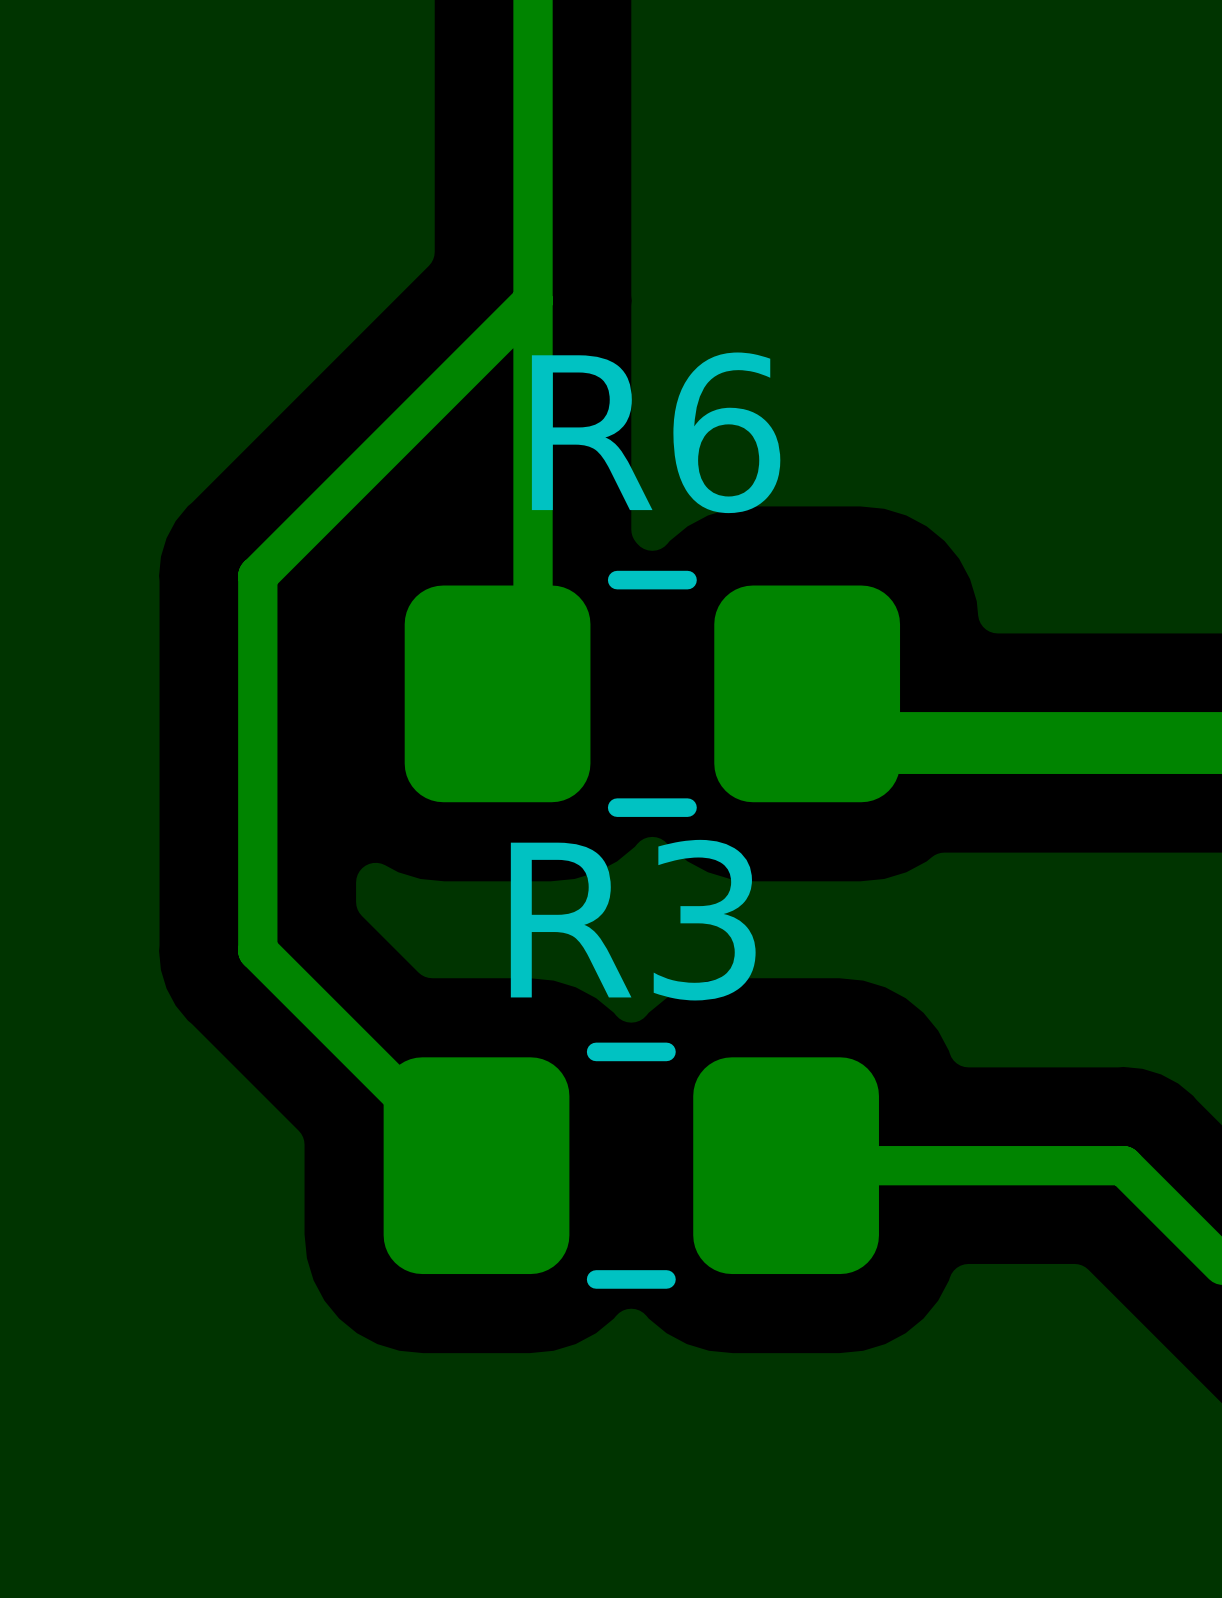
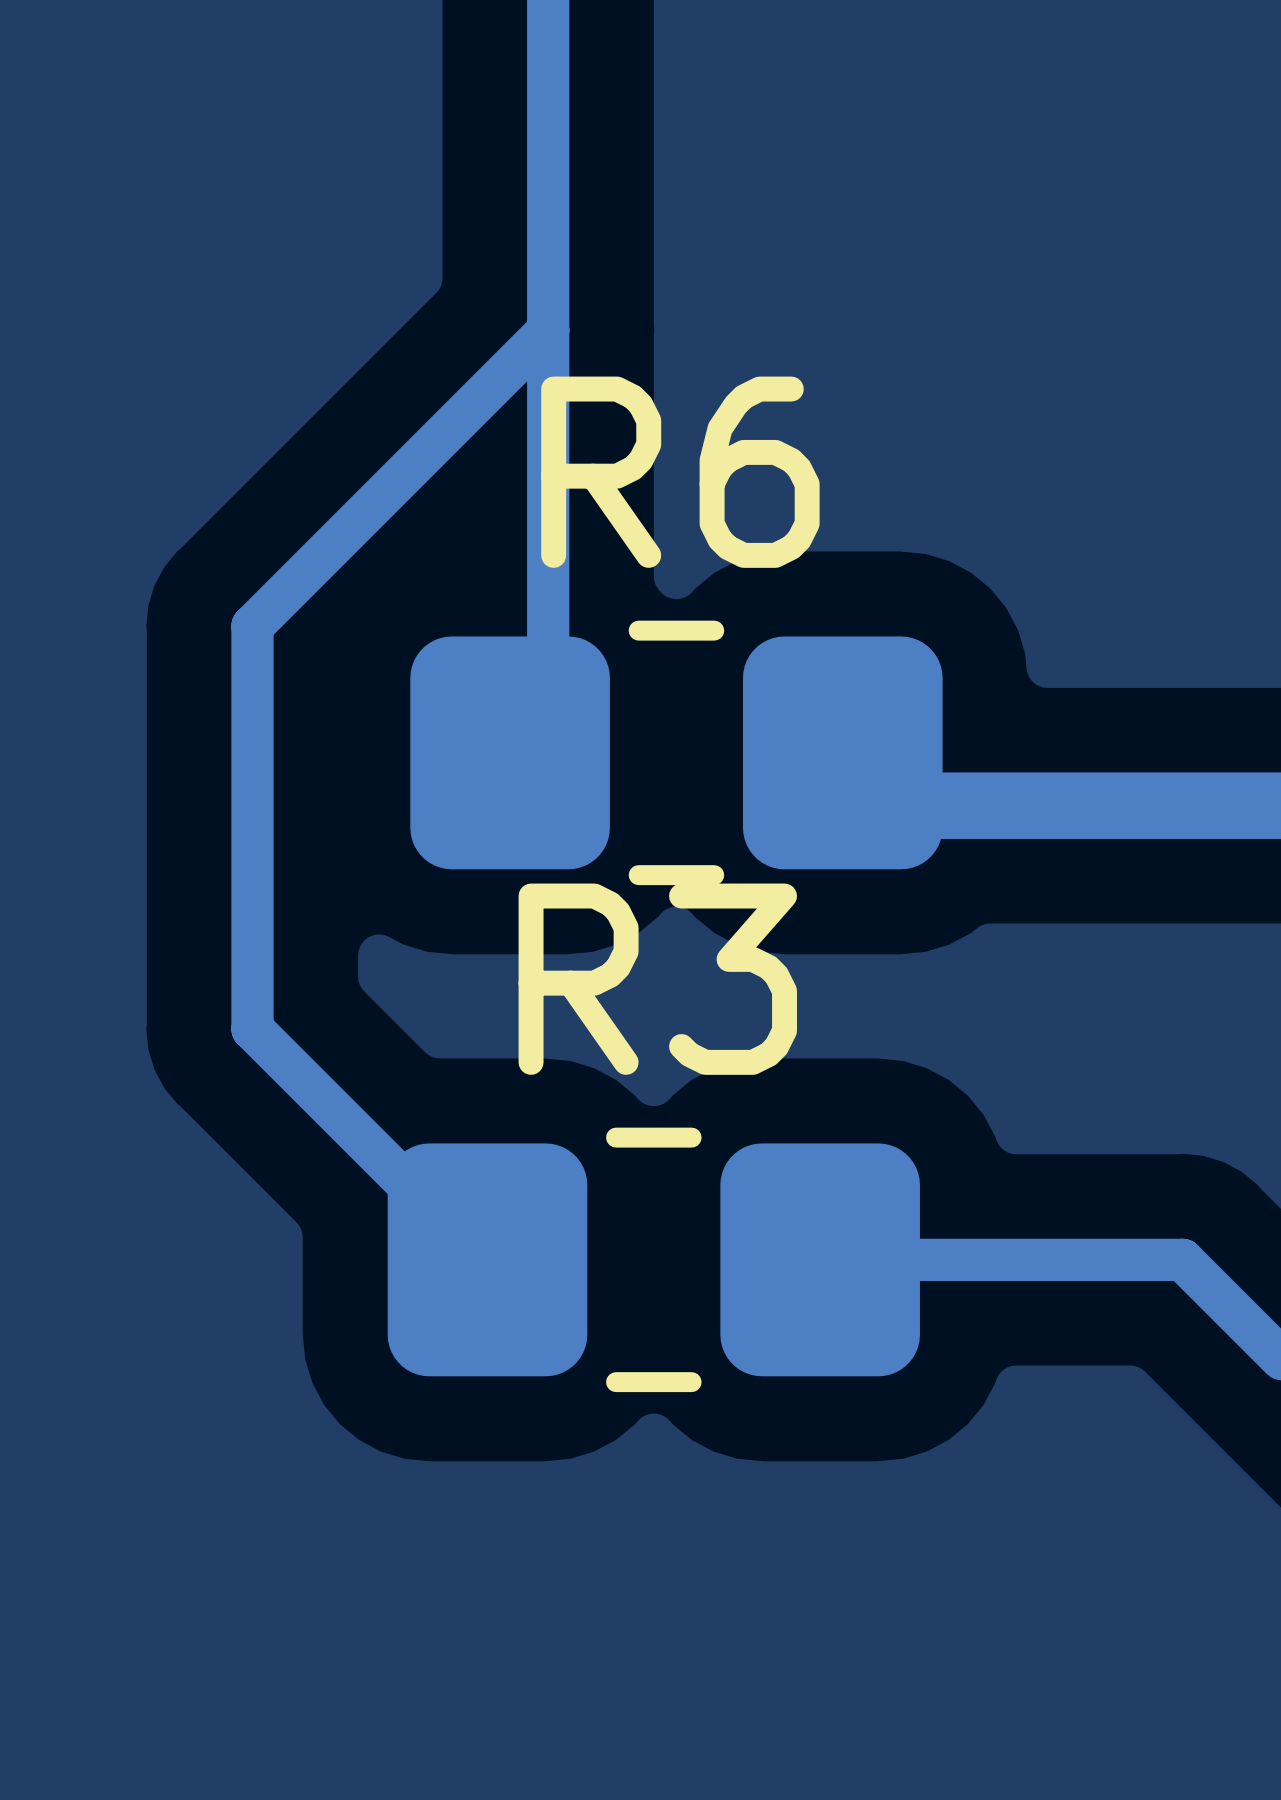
R3 name position: R3 (633, 920) -> R3 (657, 979)

